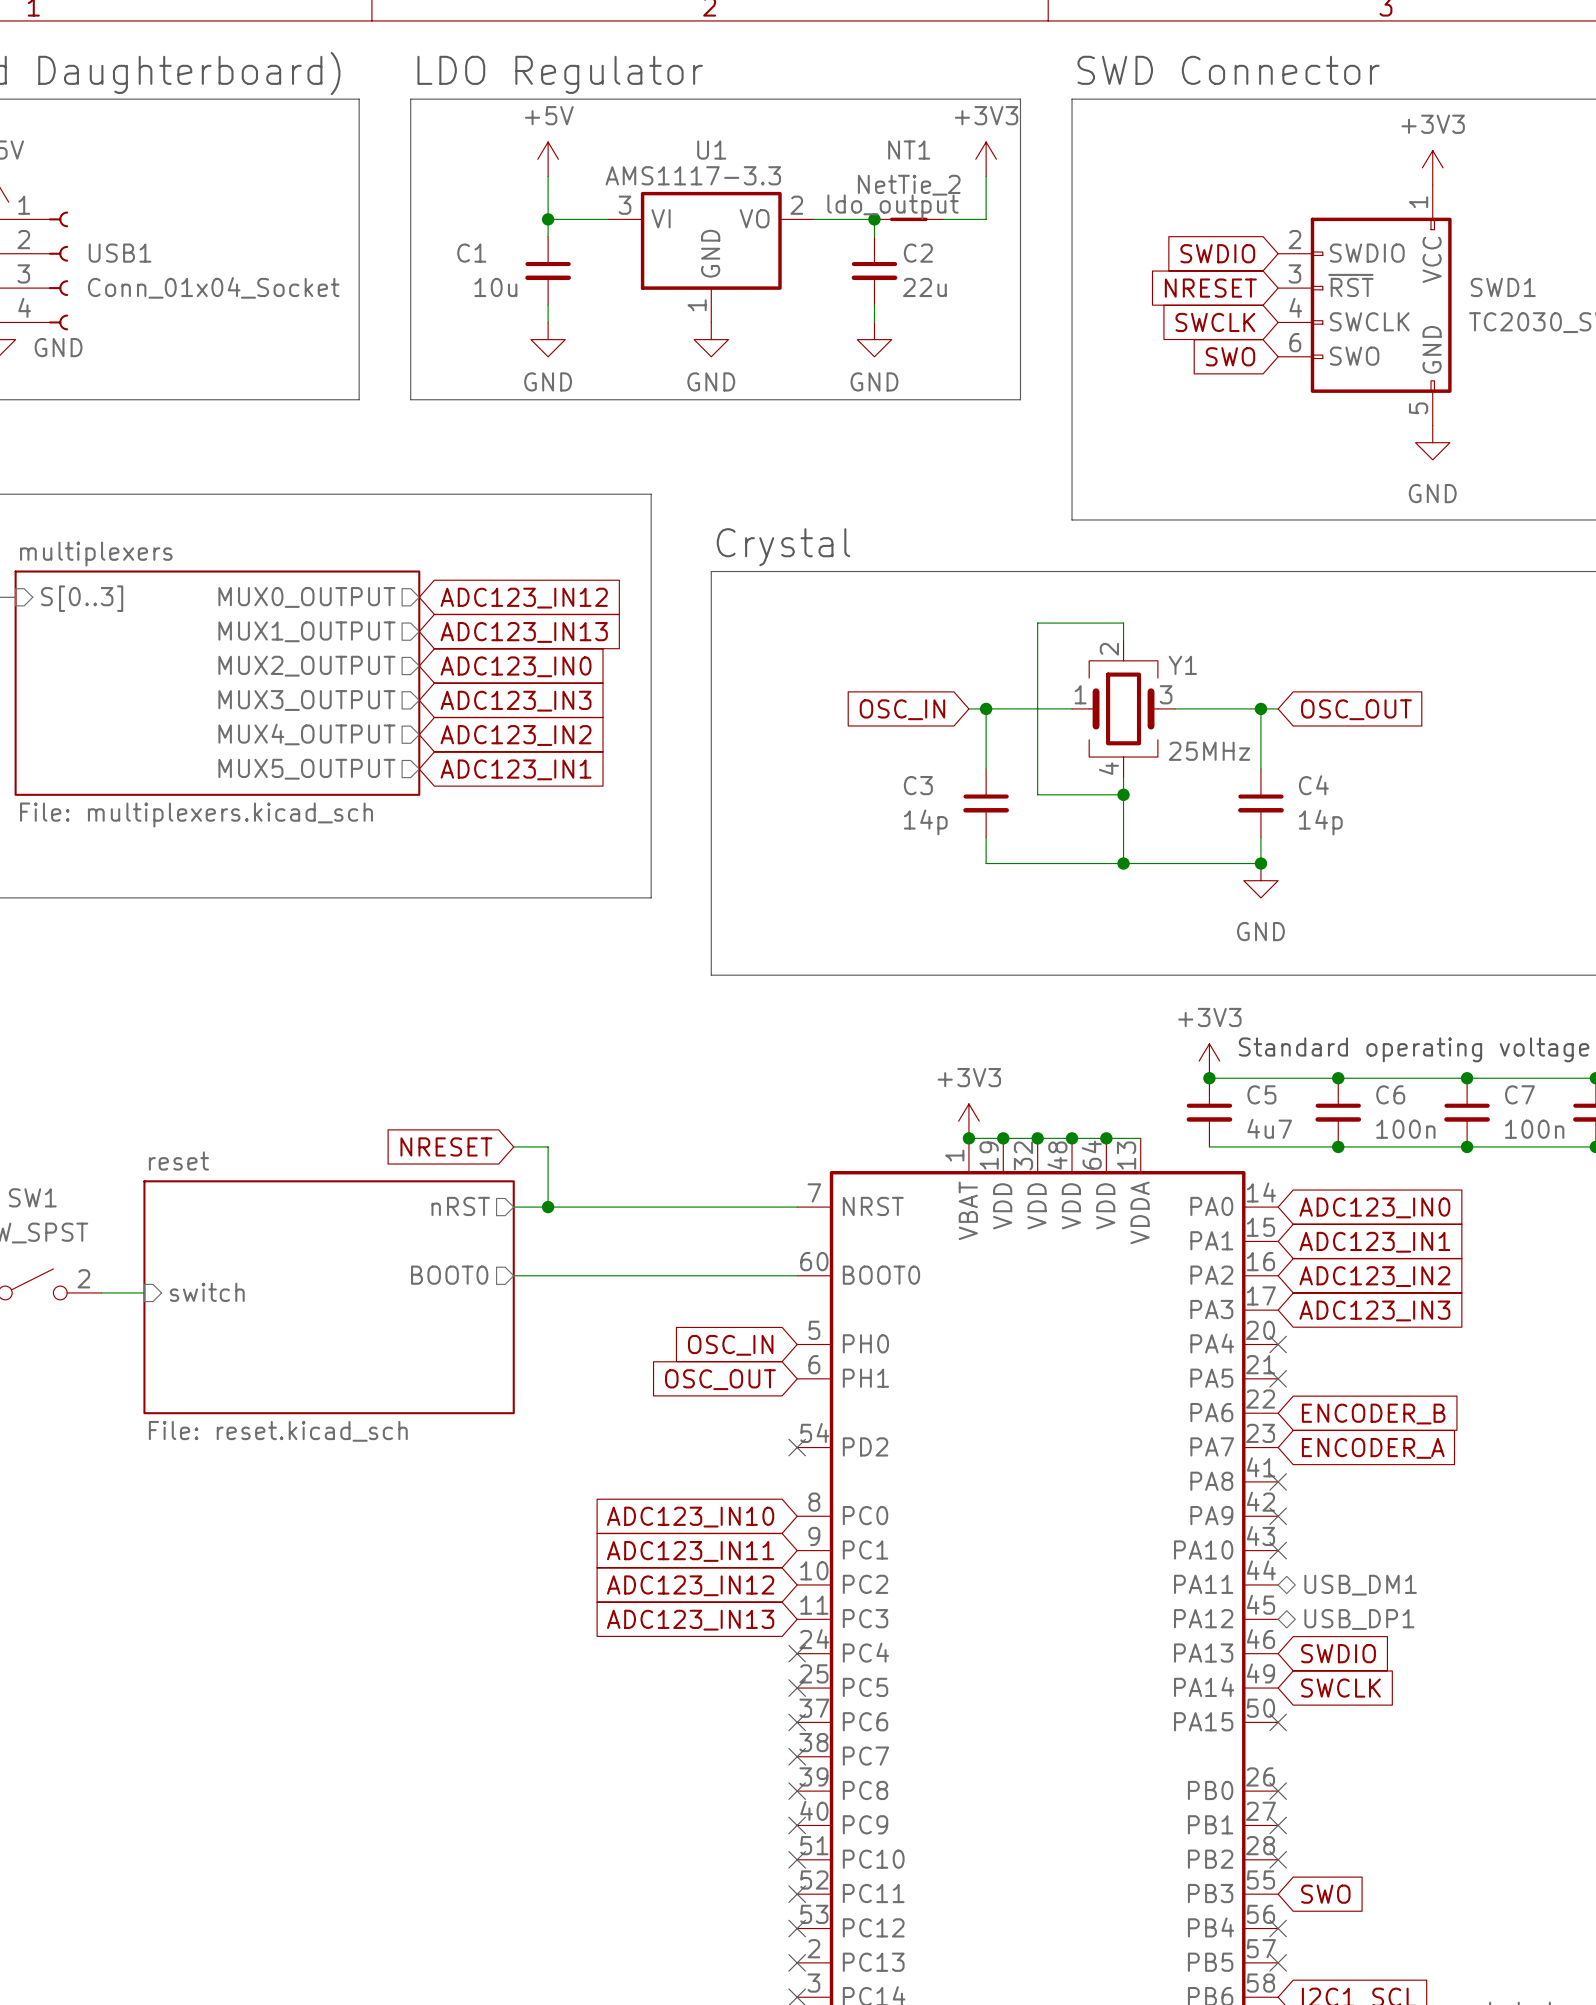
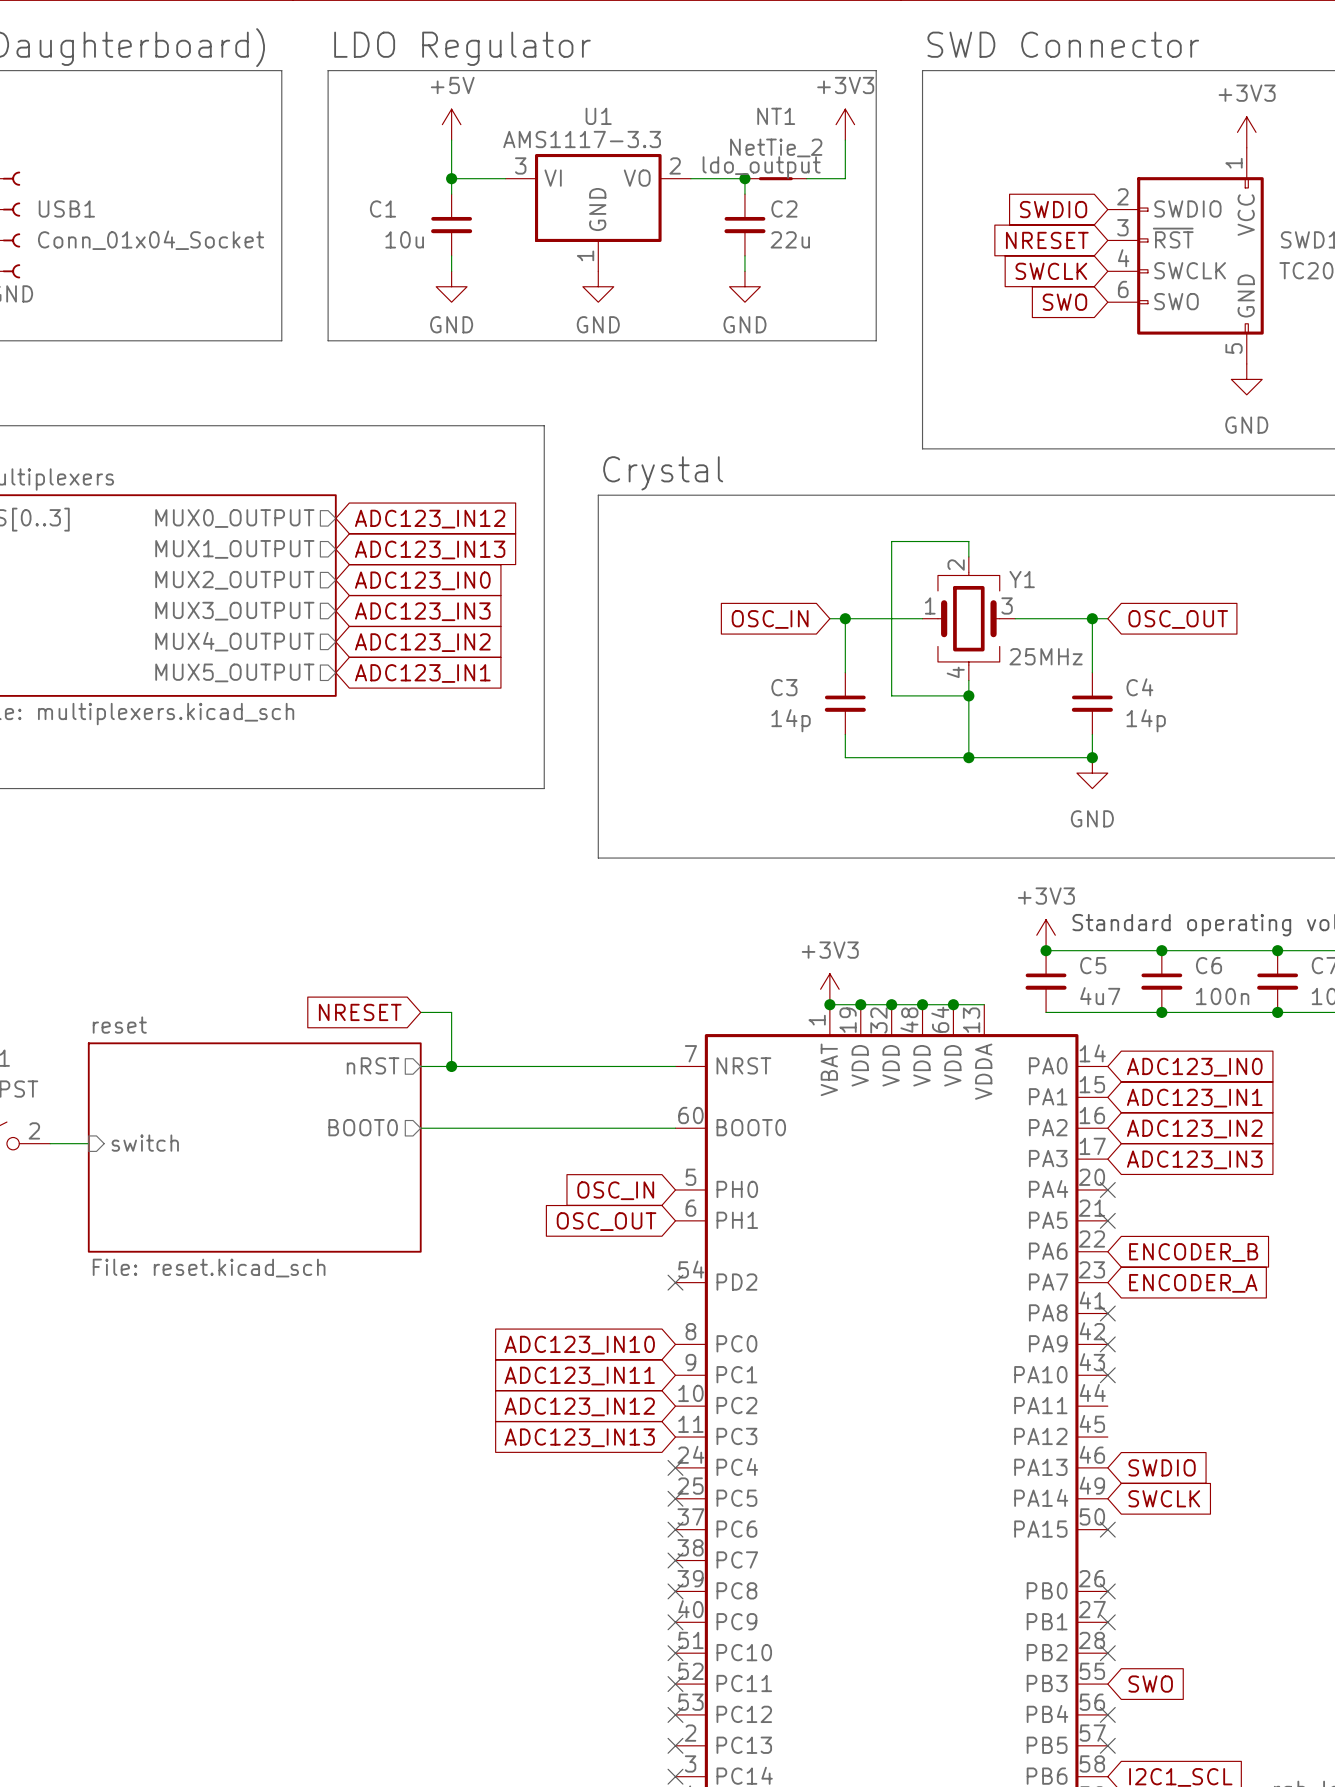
hierarchical label: USB_DM1 (1360, 1585) -> none
hierarchical label: USB_DP1 (1359, 1619) -> none

